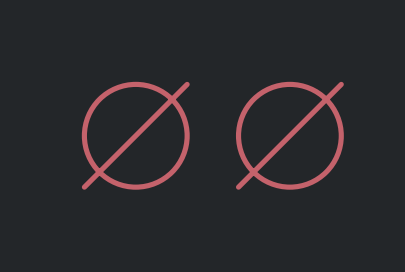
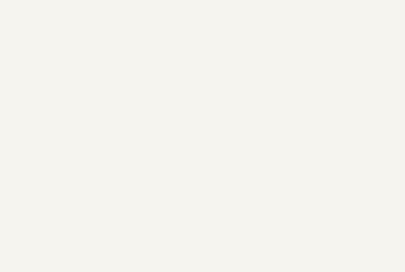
part: (135, 135) -> none
part: (289, 135) -> none

